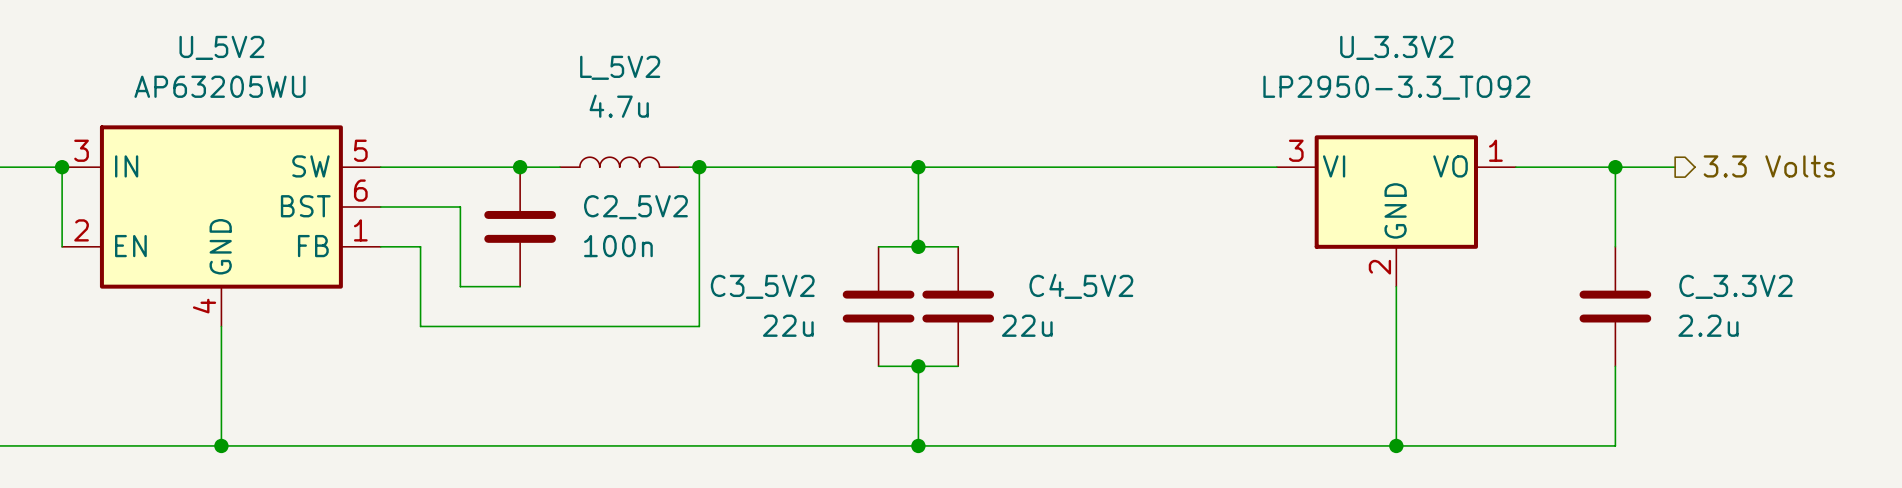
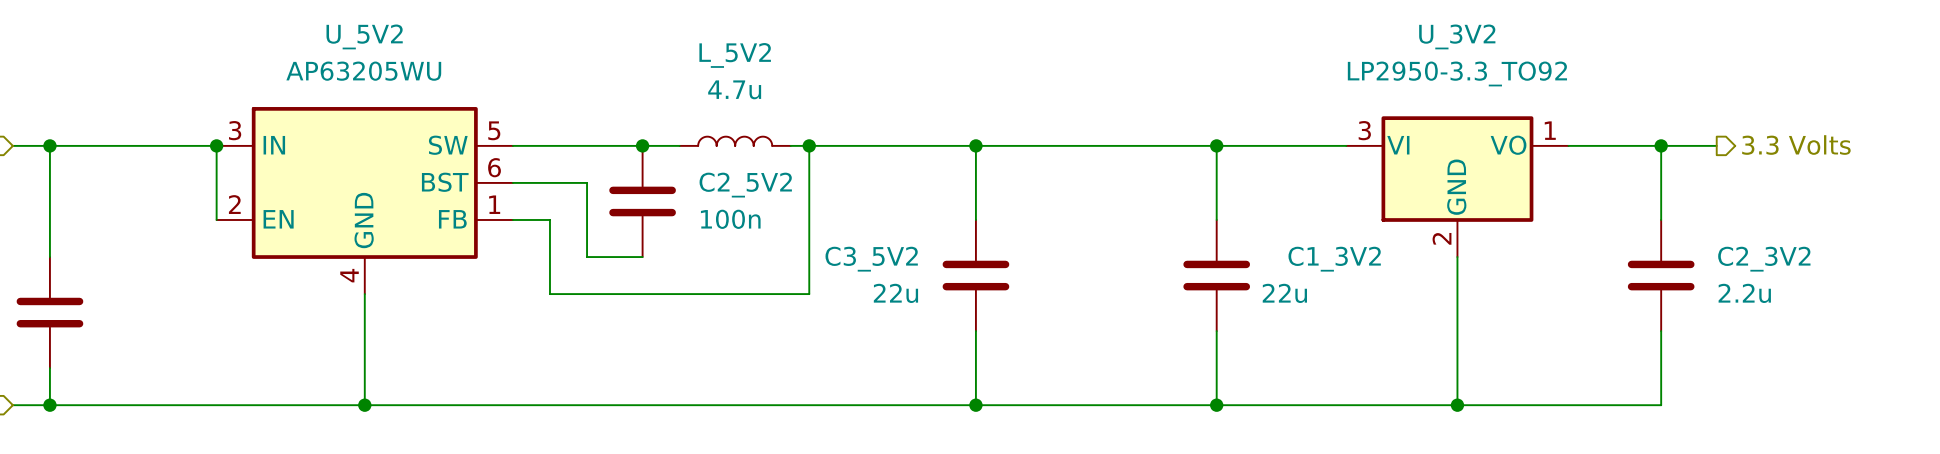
U_3.3V2 name: U_3.3V2 (1396, 47) -> U_3V2 (1457, 36)
wire: (918, 167) (918, 246) -> (1216, 145) (1216, 219)
junction position: (918, 167) -> (975, 145)
junction: none -> (1216, 145)
wire: (878, 246) (958, 246) -> (975, 219) (975, 145)
junction: (918, 246) -> none
C_3.3V2 name: C_3.3V2 (1735, 286) -> C2_3V2 (1764, 259)
C4_5V2: 22u (958, 306) -> none
C1_3V2: none -> 22u (1216, 275)
wire: (878, 366) (958, 366) -> (975, 331) (975, 405)
wire: (918, 366) (918, 445) -> (1216, 331) (1216, 405)
junction: (918, 366) -> none
junction position: (918, 445) -> (975, 405)
junction: none -> (1216, 405)

